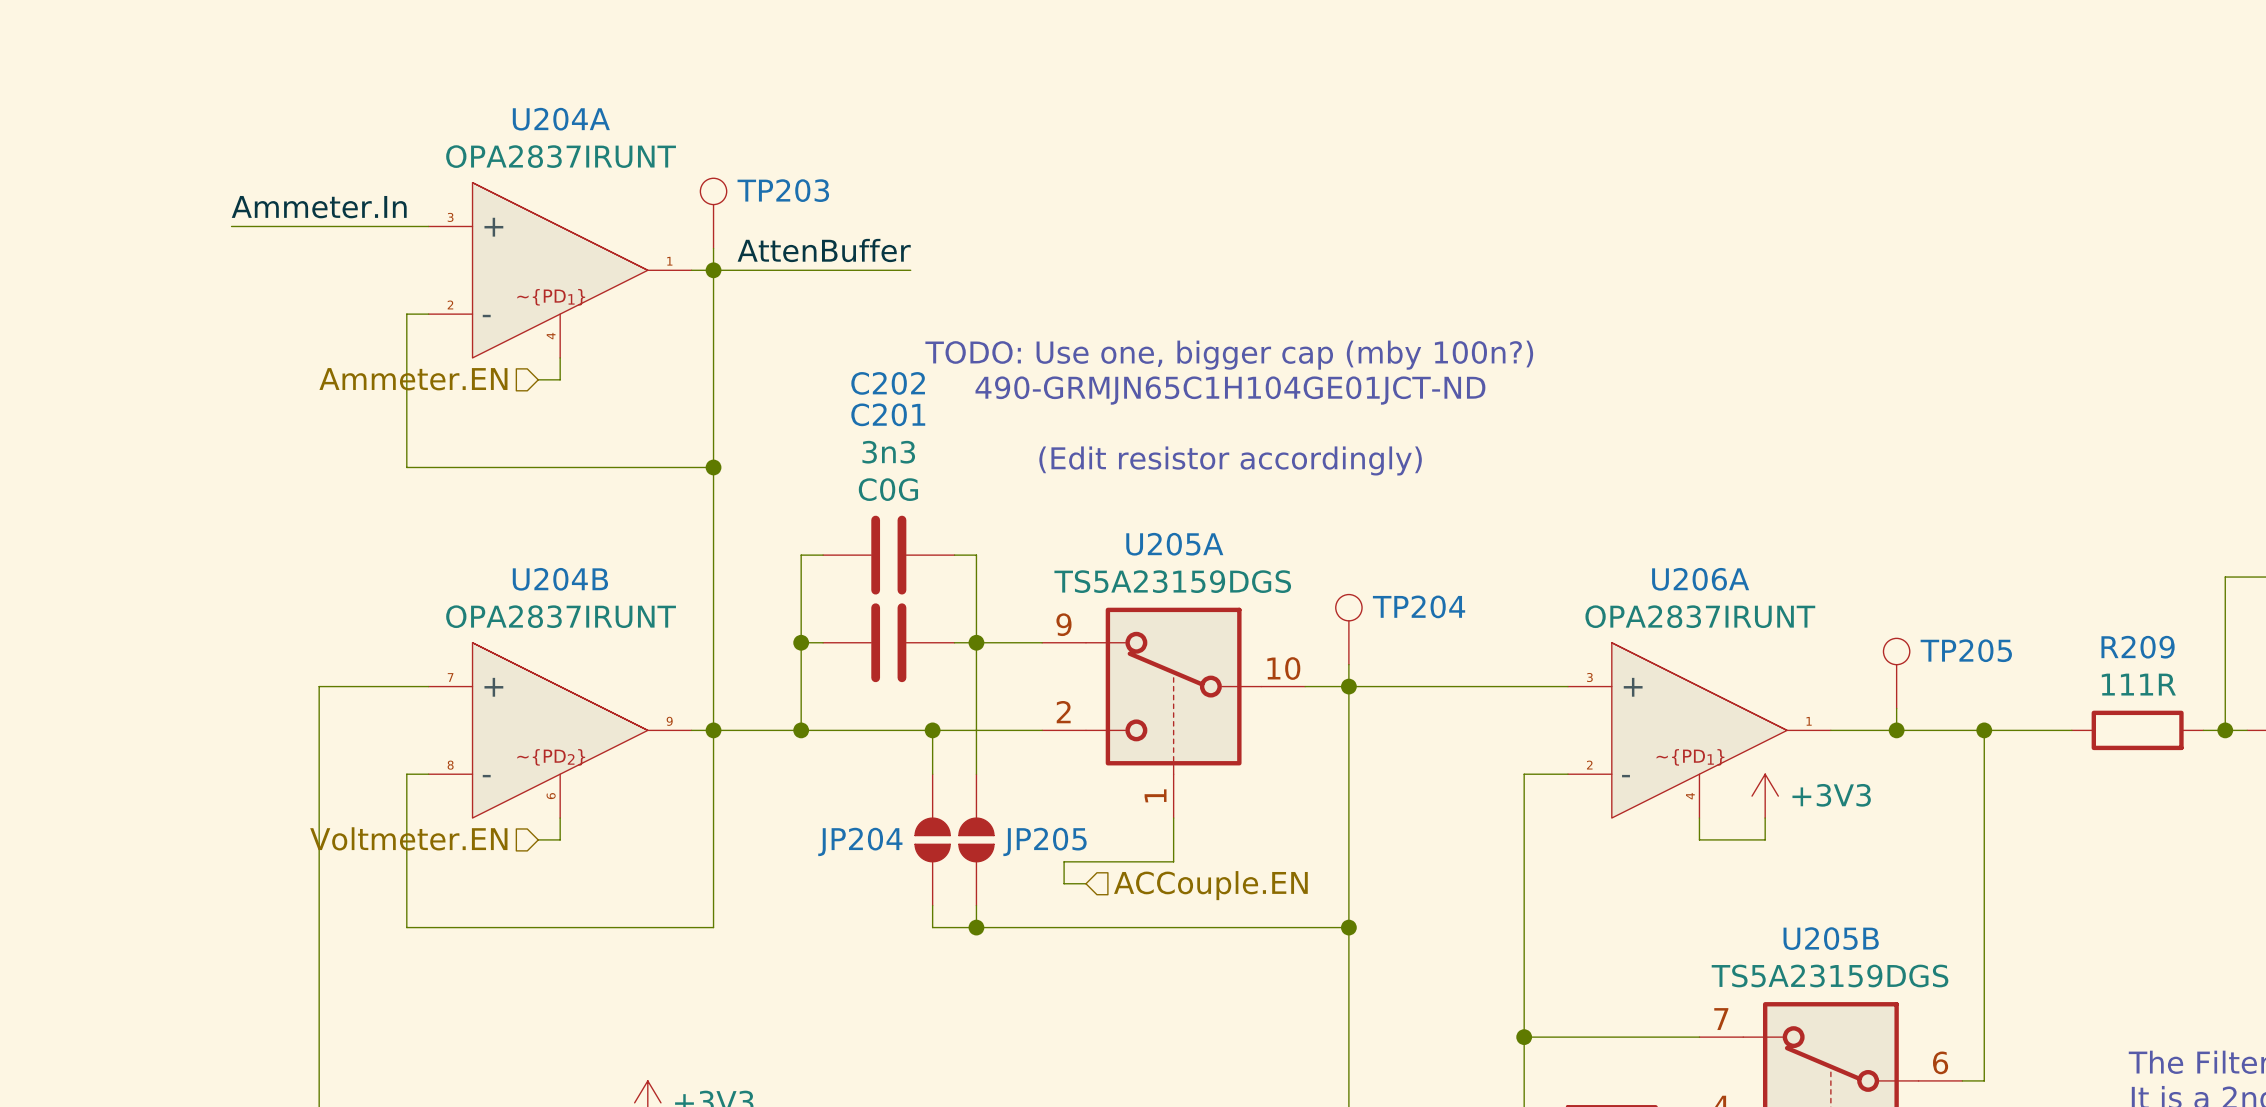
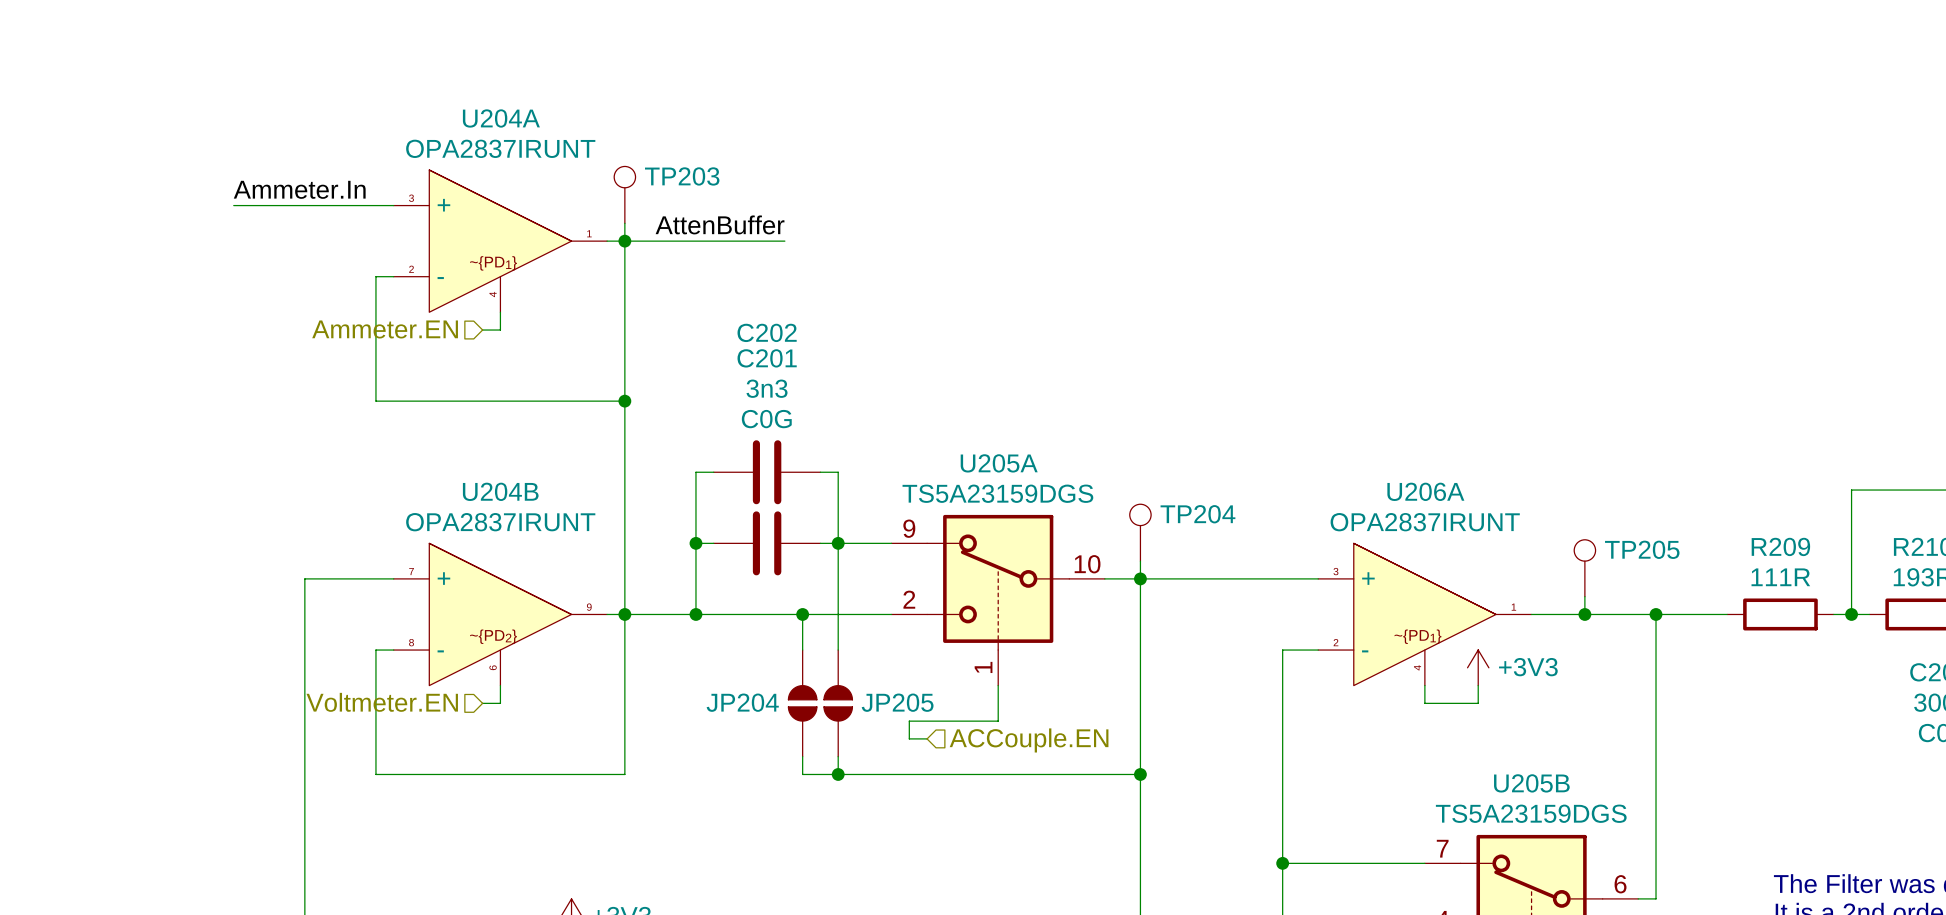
text: TODO: Use one, bigger cap (mby 100n?) (1229, 355) -> none
text: 490-GRMJN65C1H104GE01JCT-ND (1230, 390) -> none
text: (Edit resistor accordingly) (1230, 460) -> none

